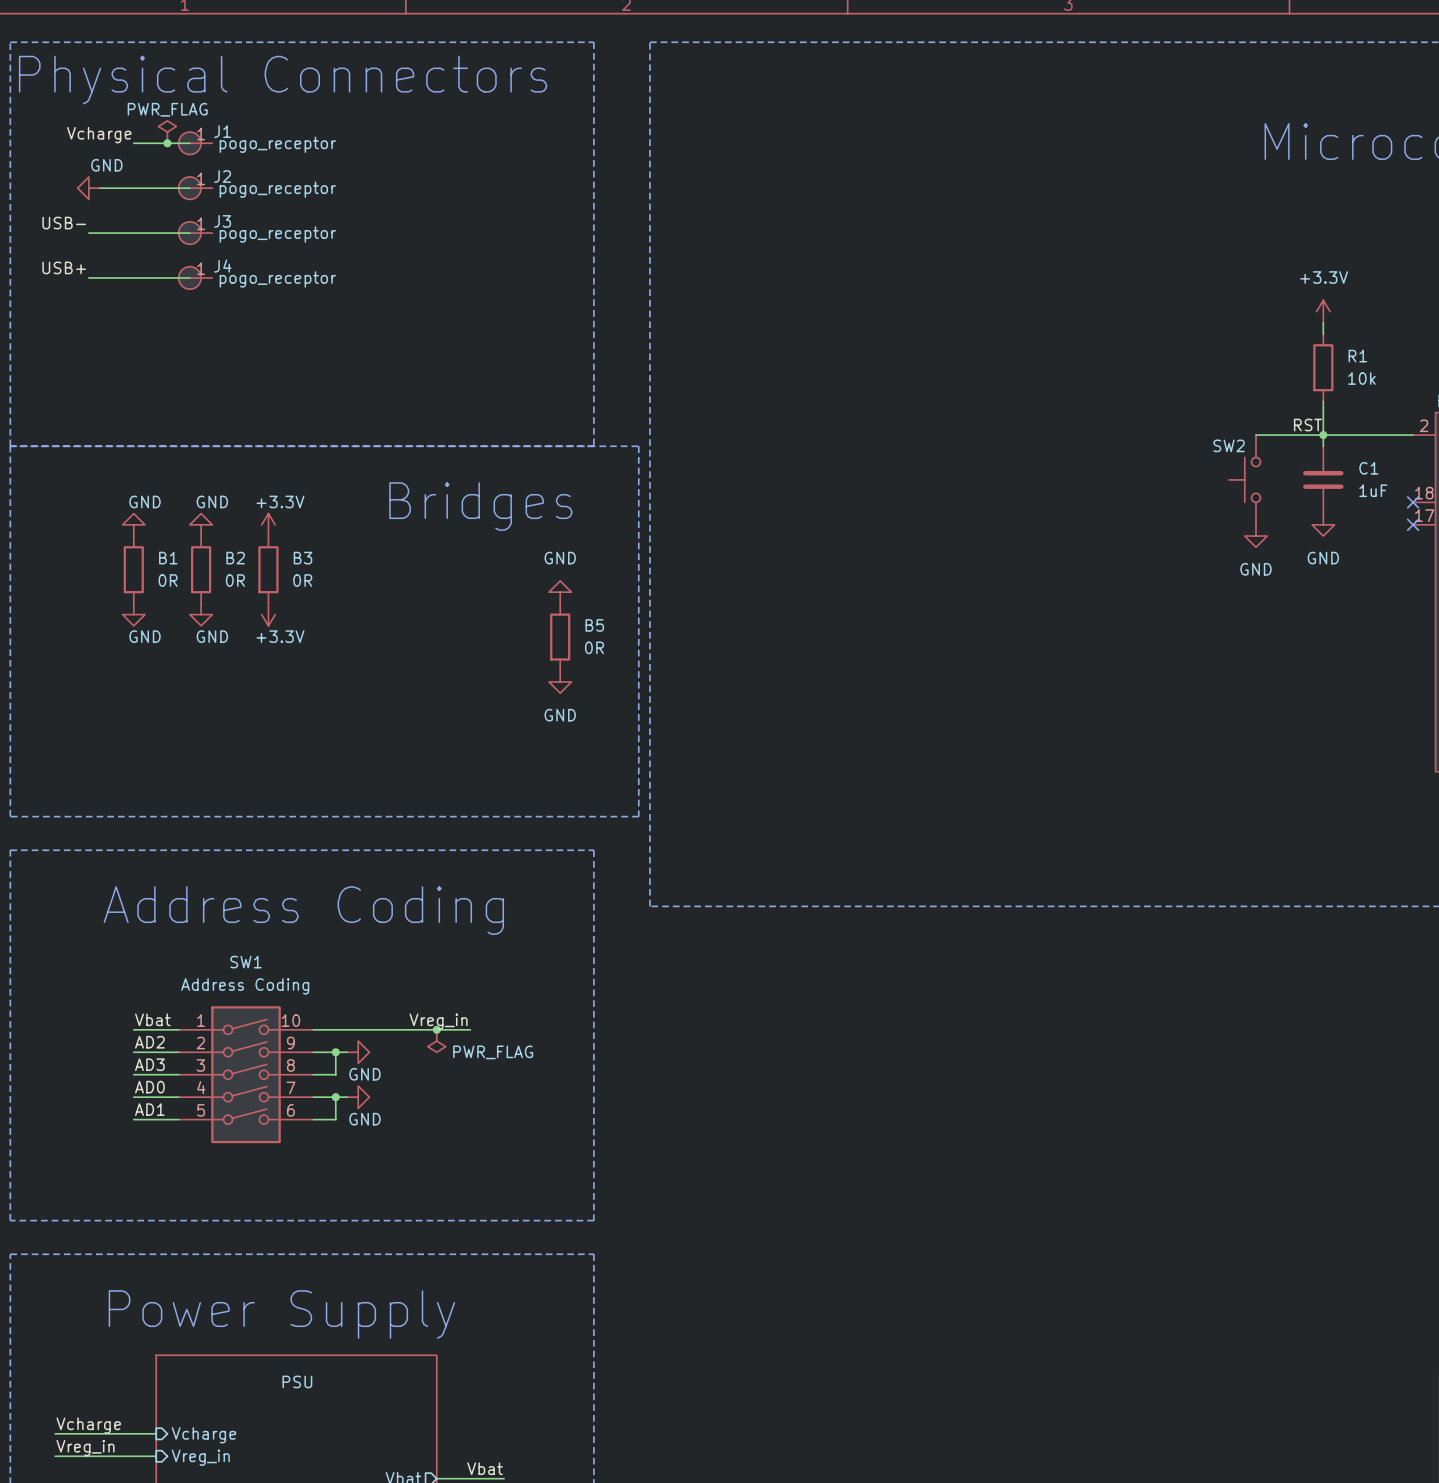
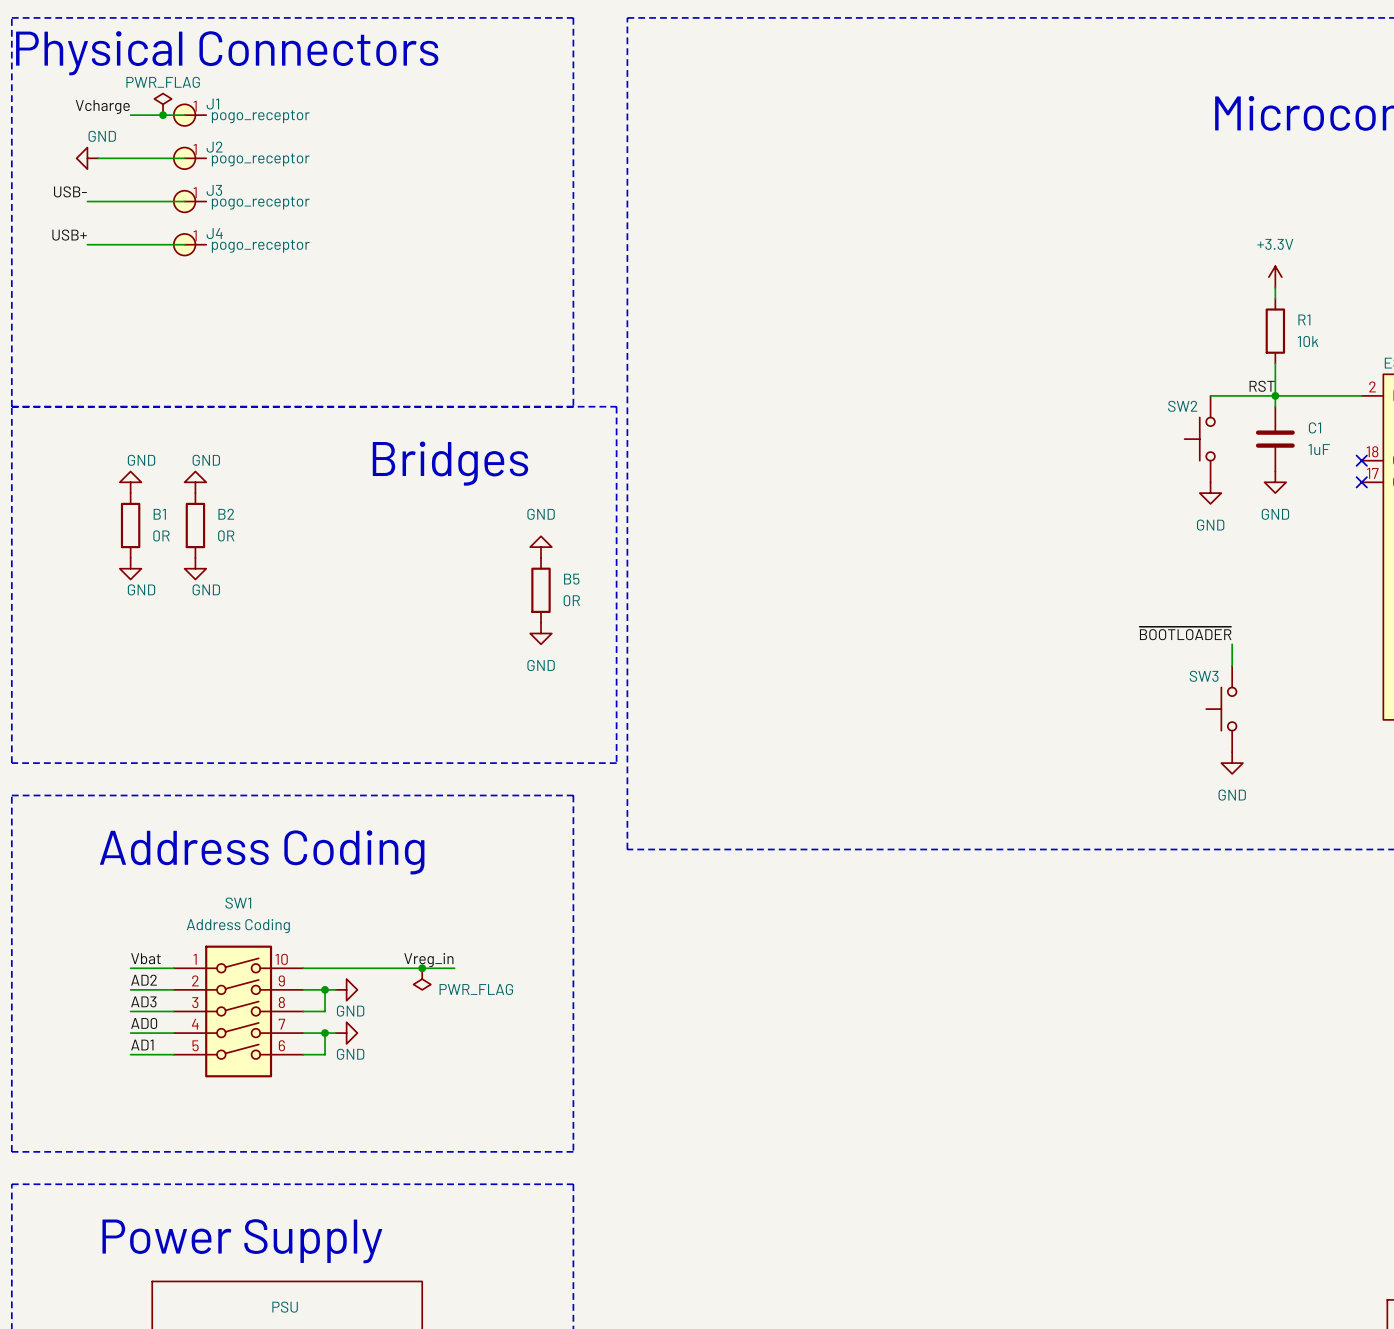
power symbol: +3.3V (268, 524) -> none
B3: 0R (268, 569) -> none
power symbol: +3.3V (268, 614) -> none
label: none -> ~{BOOTLOADER} (1185, 633)
wire: none -> (1232, 644) (1232, 665)
SW3: none -> (1221, 709)
power symbol: none -> GND (1232, 763)

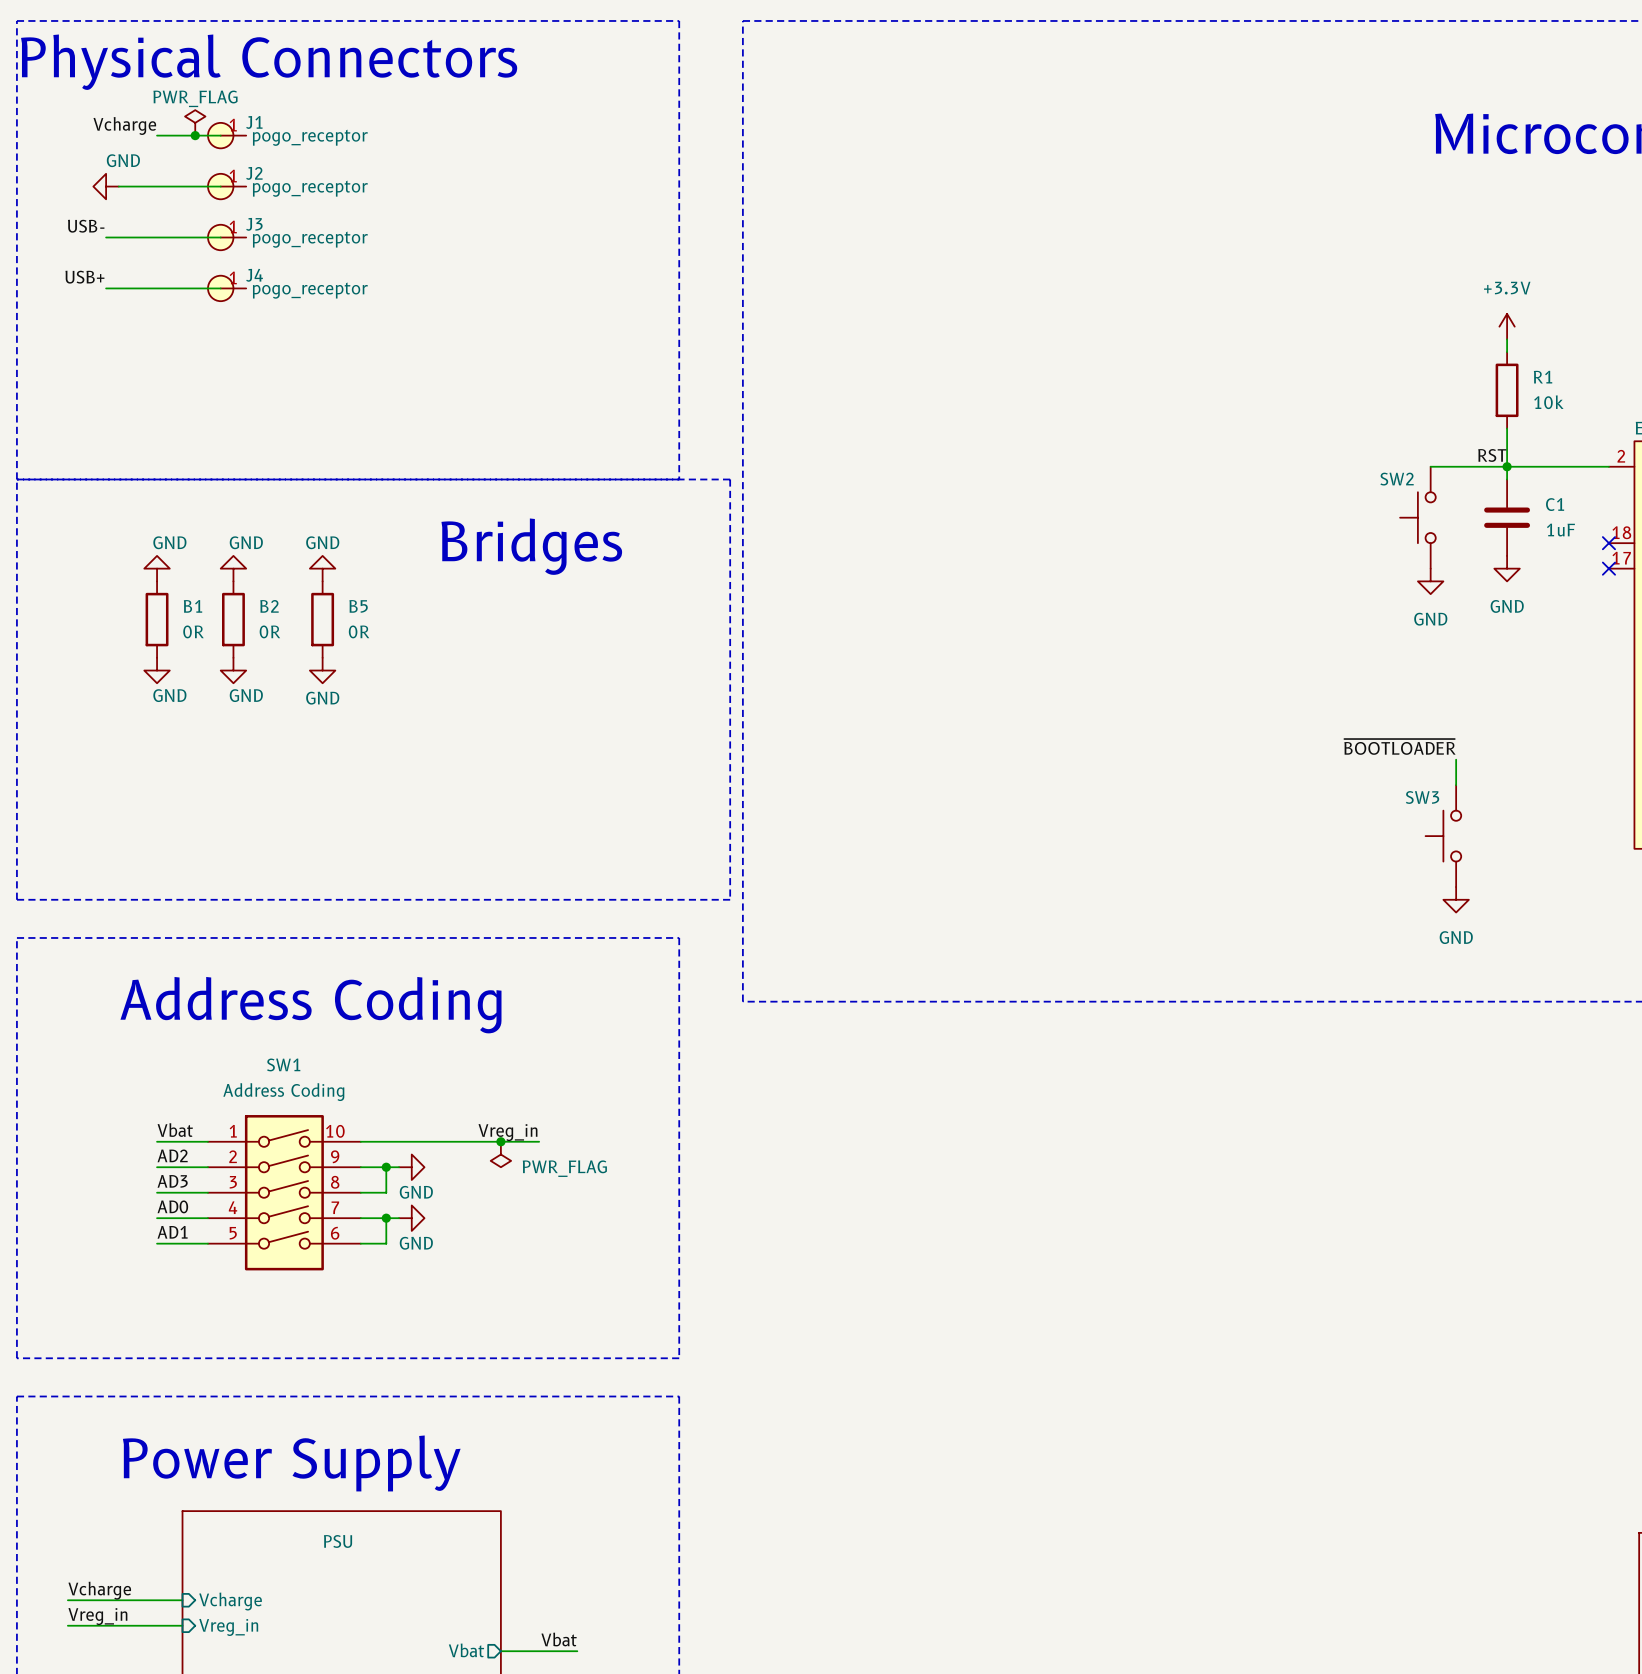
power symbol: none -> GND (322, 568)
power symbol: GND (541, 547) -> none
power symbol: none -> GND (322, 670)
B5 position: (541, 590) -> (322, 619)
power symbol: GND (541, 633) -> none

